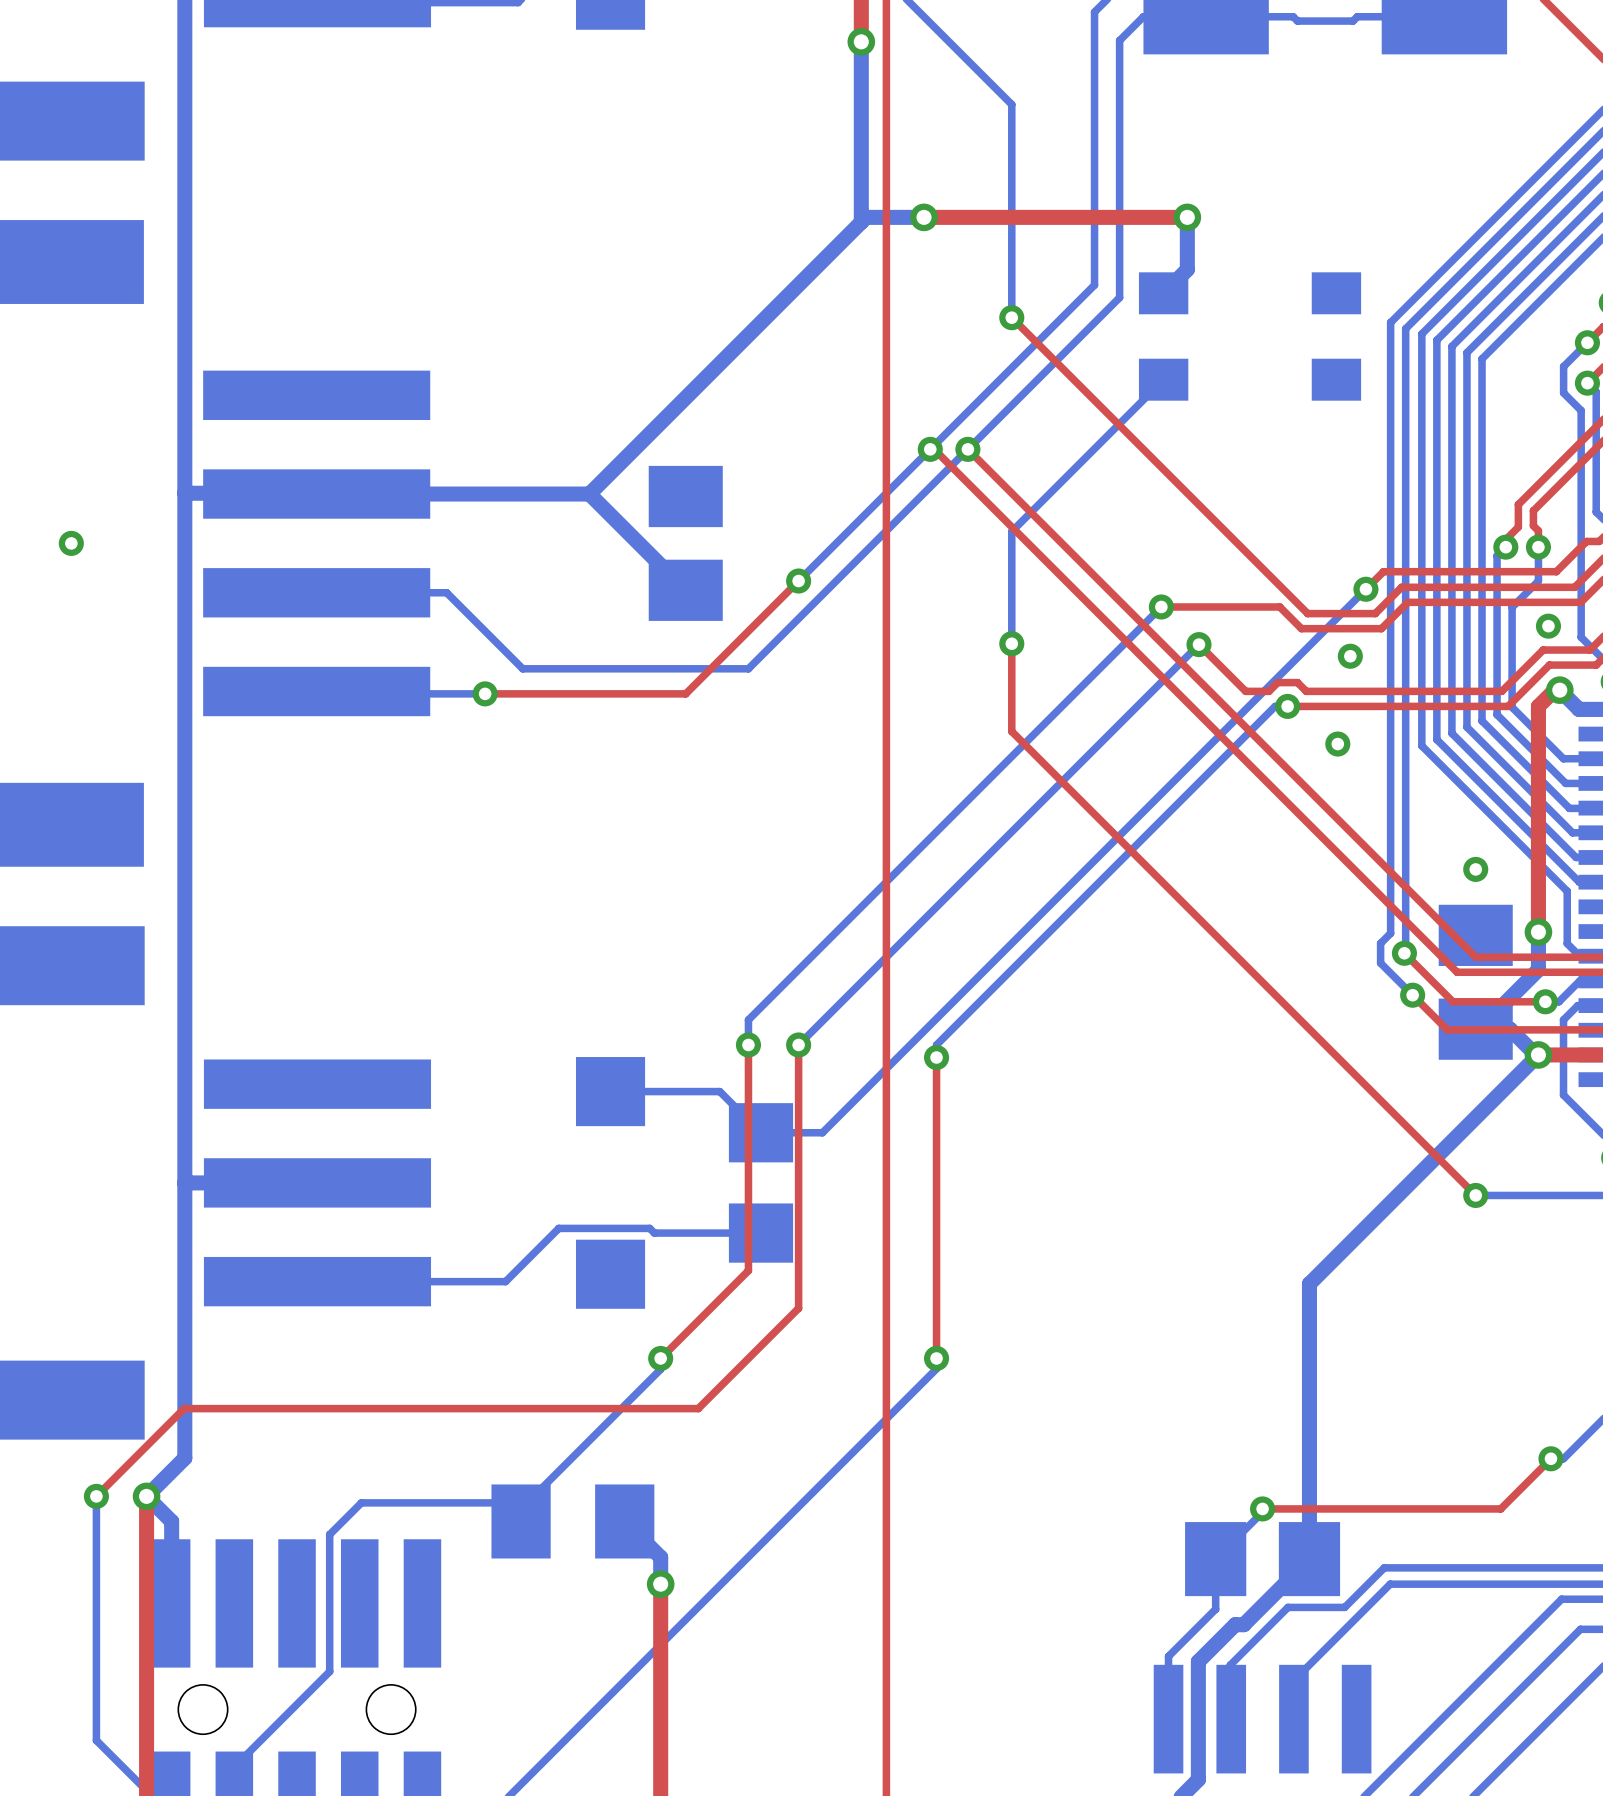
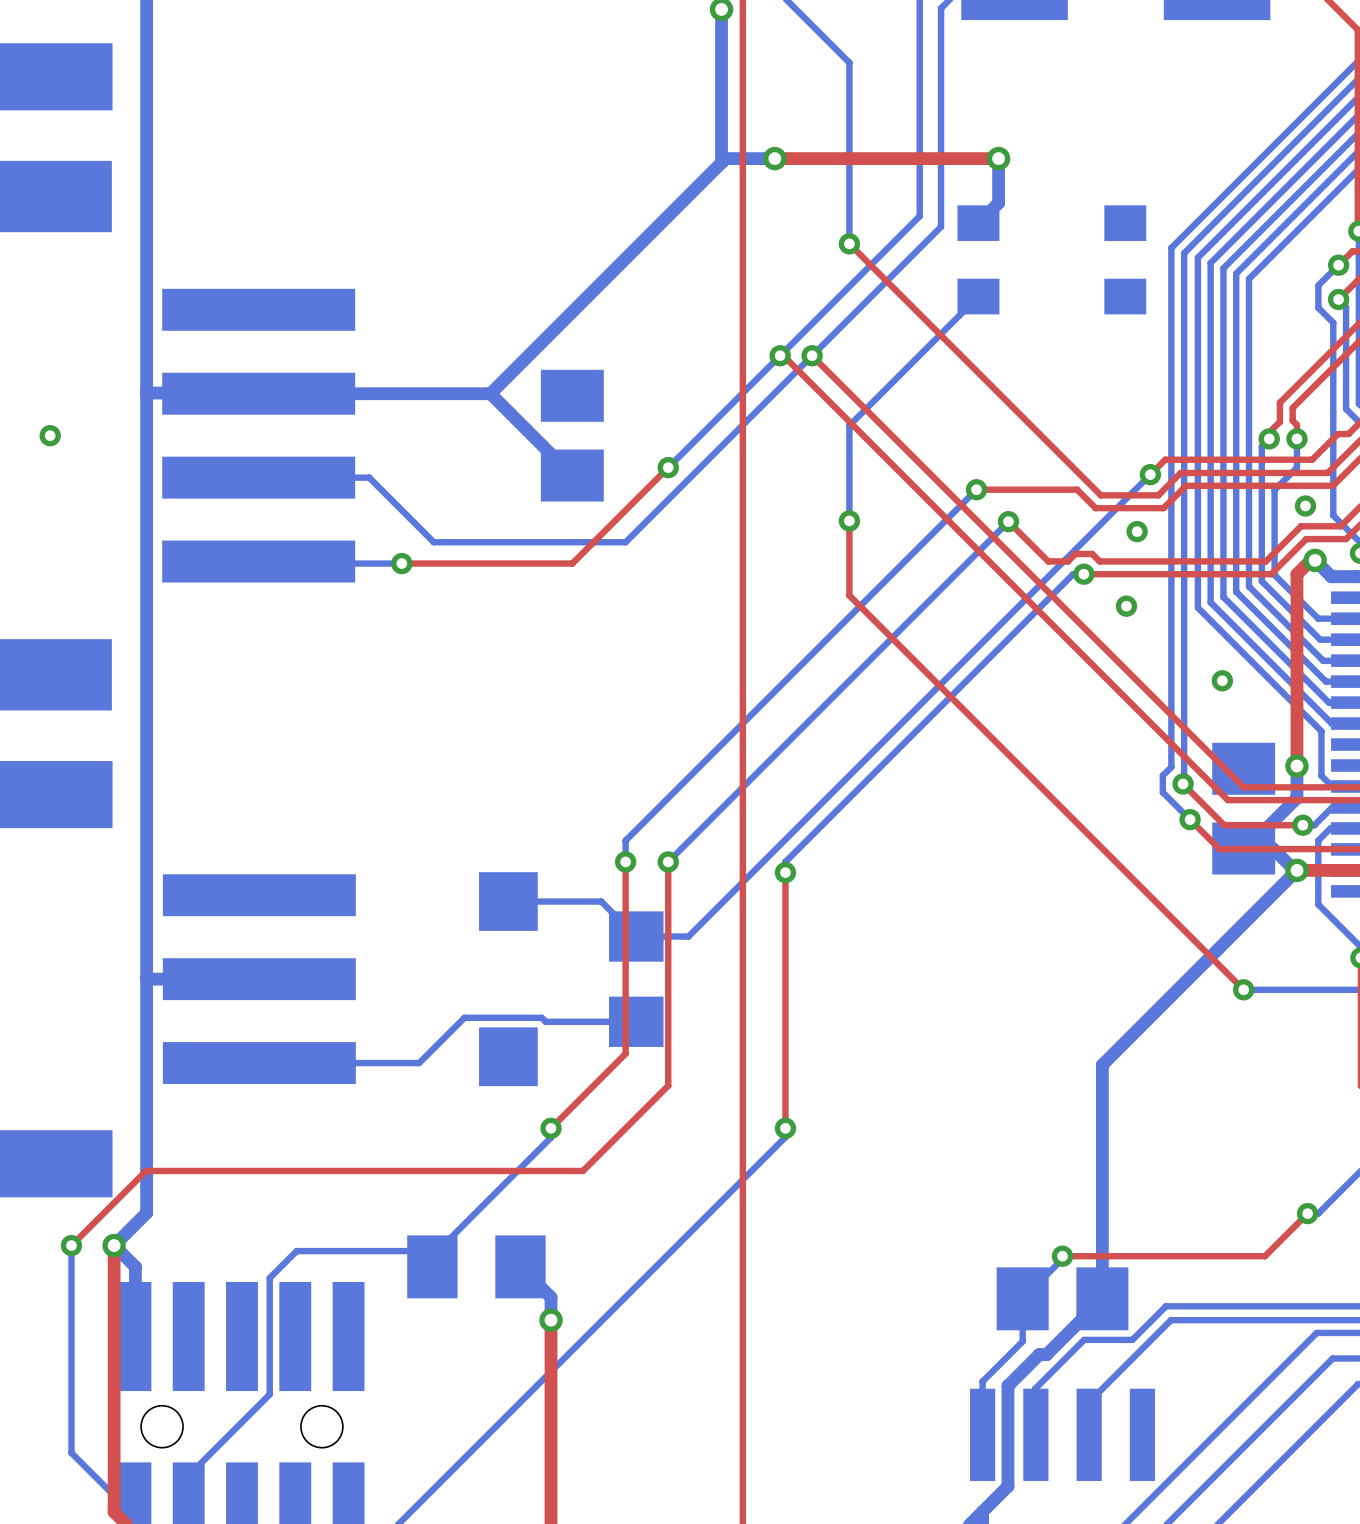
via position: (1475, 869) -> (1222, 680)

